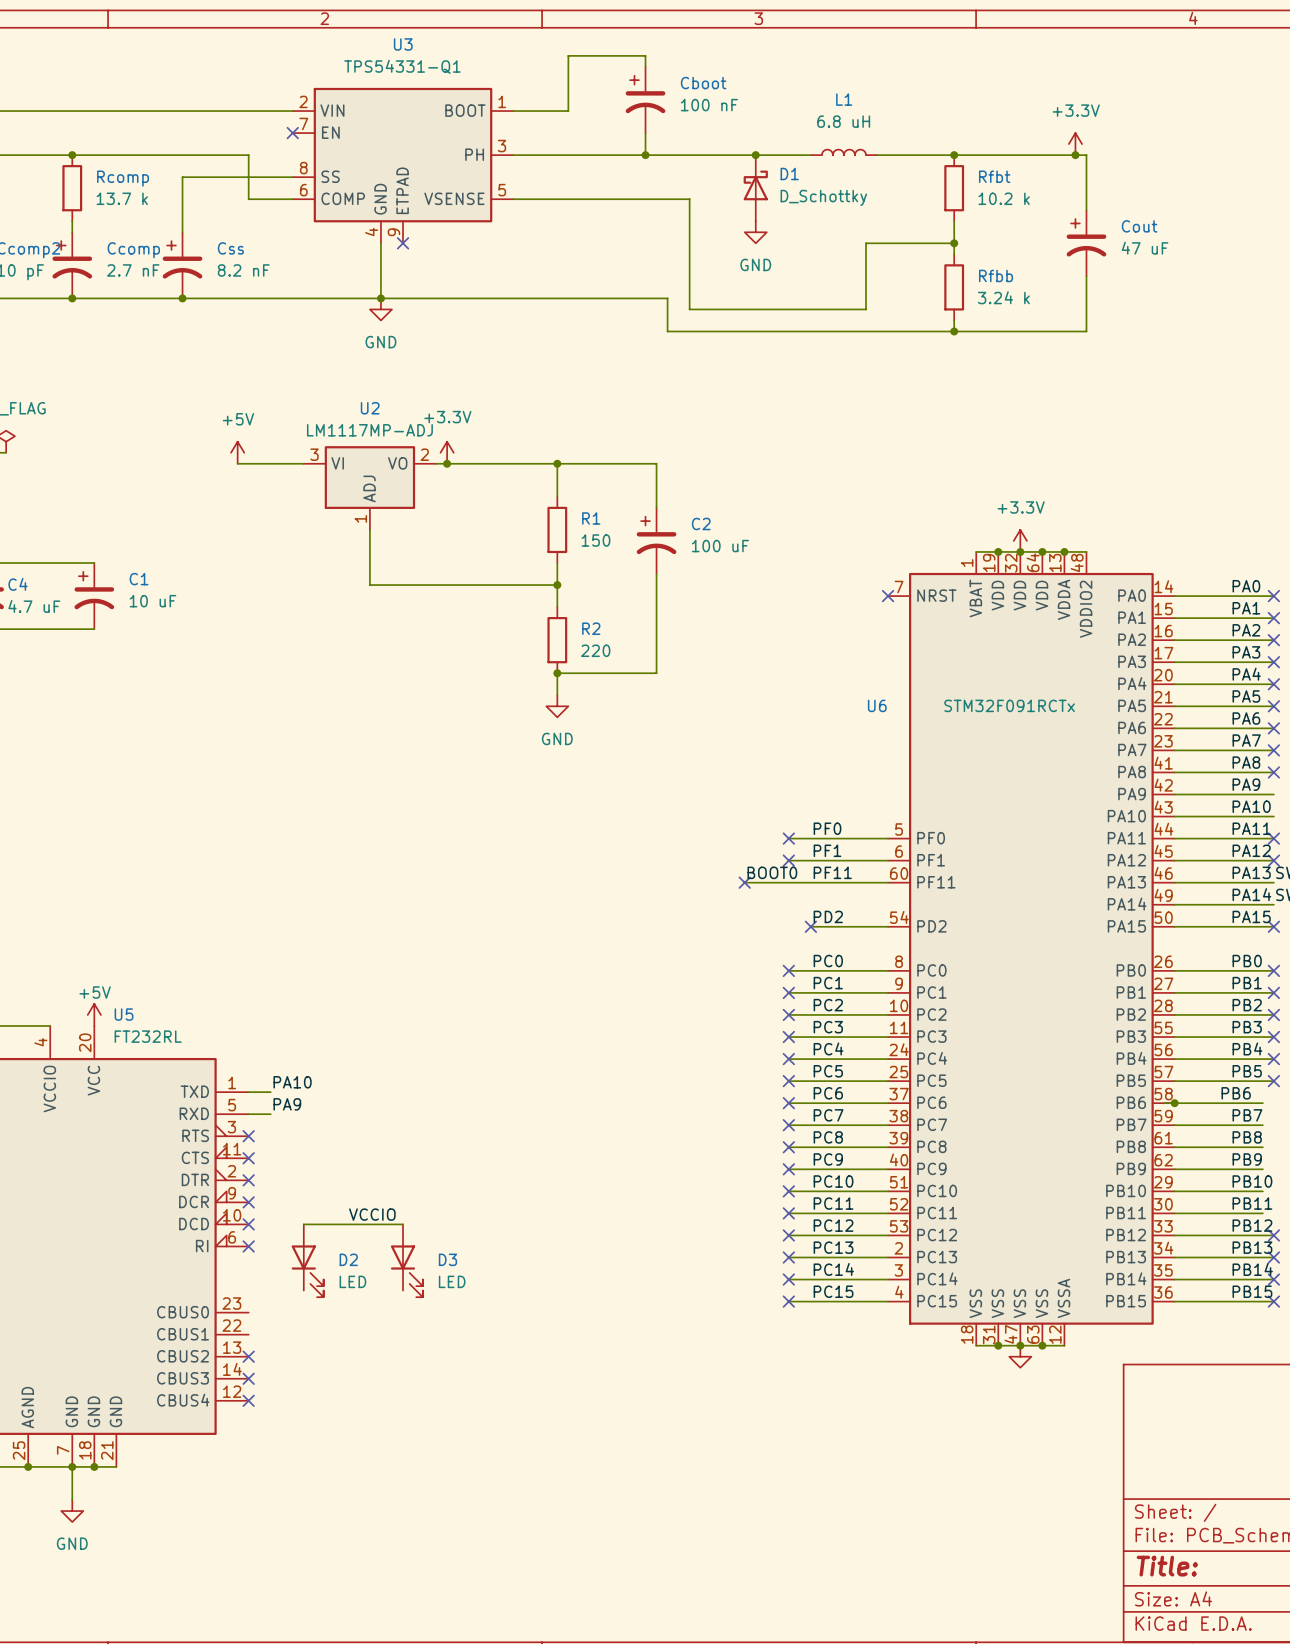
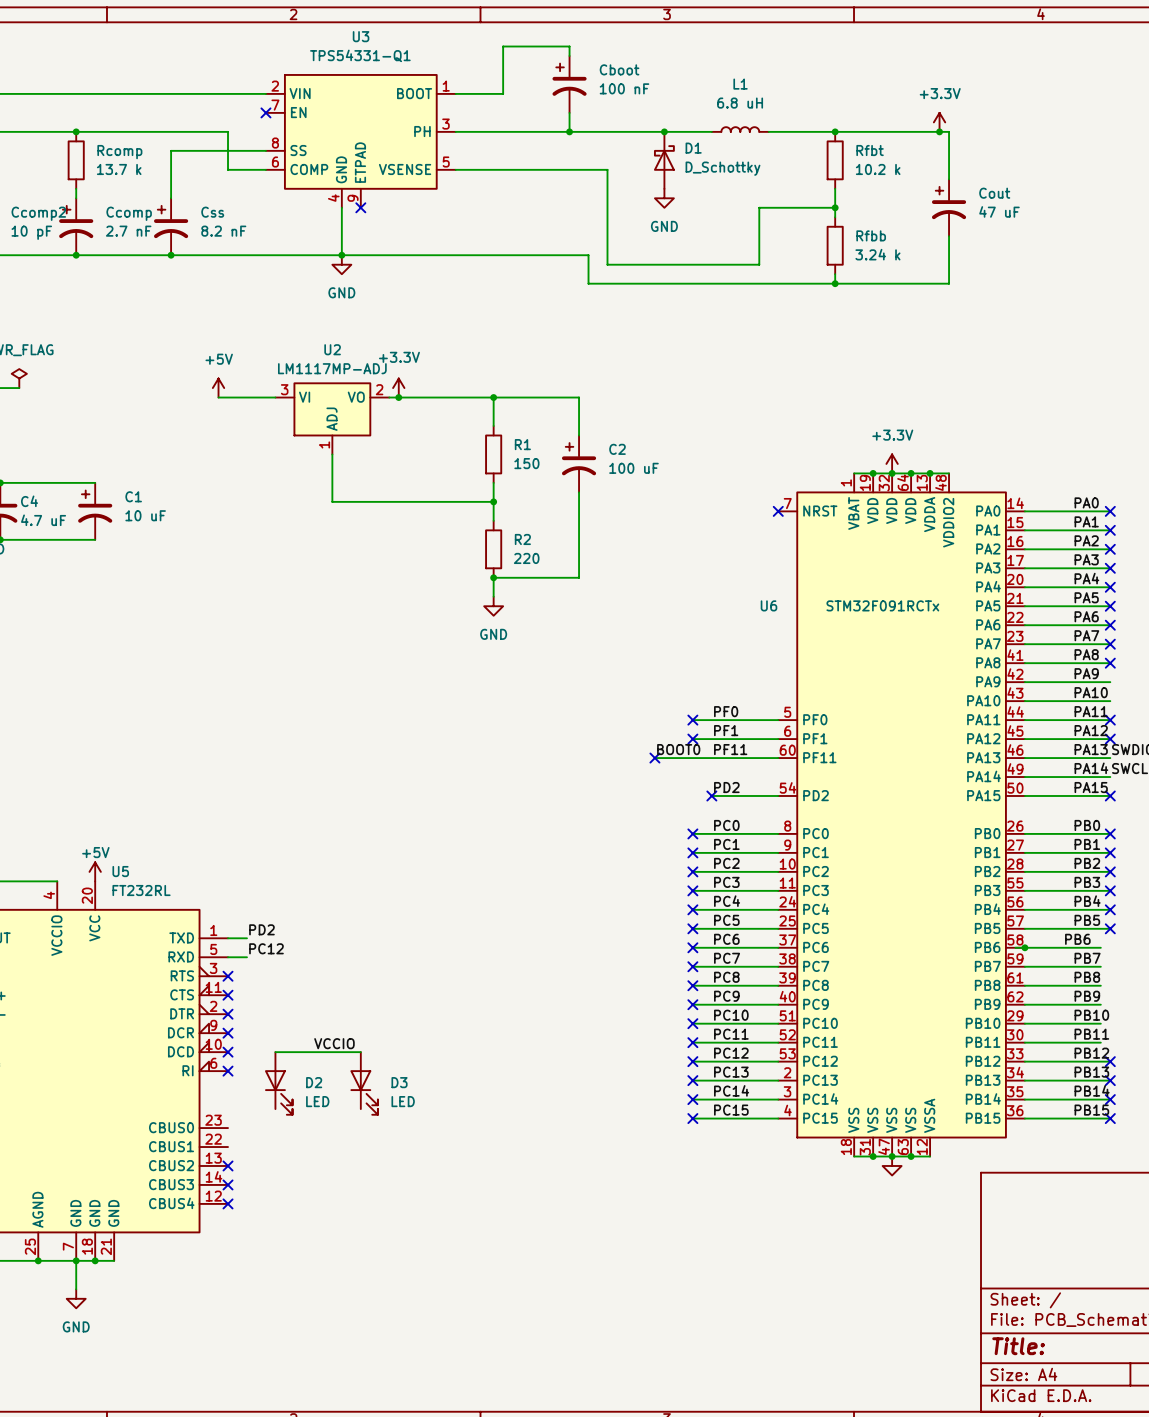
label: PA10 (292, 1082) -> PD2 (261, 929)
label: PA9 (287, 1104) -> PC12 (266, 948)

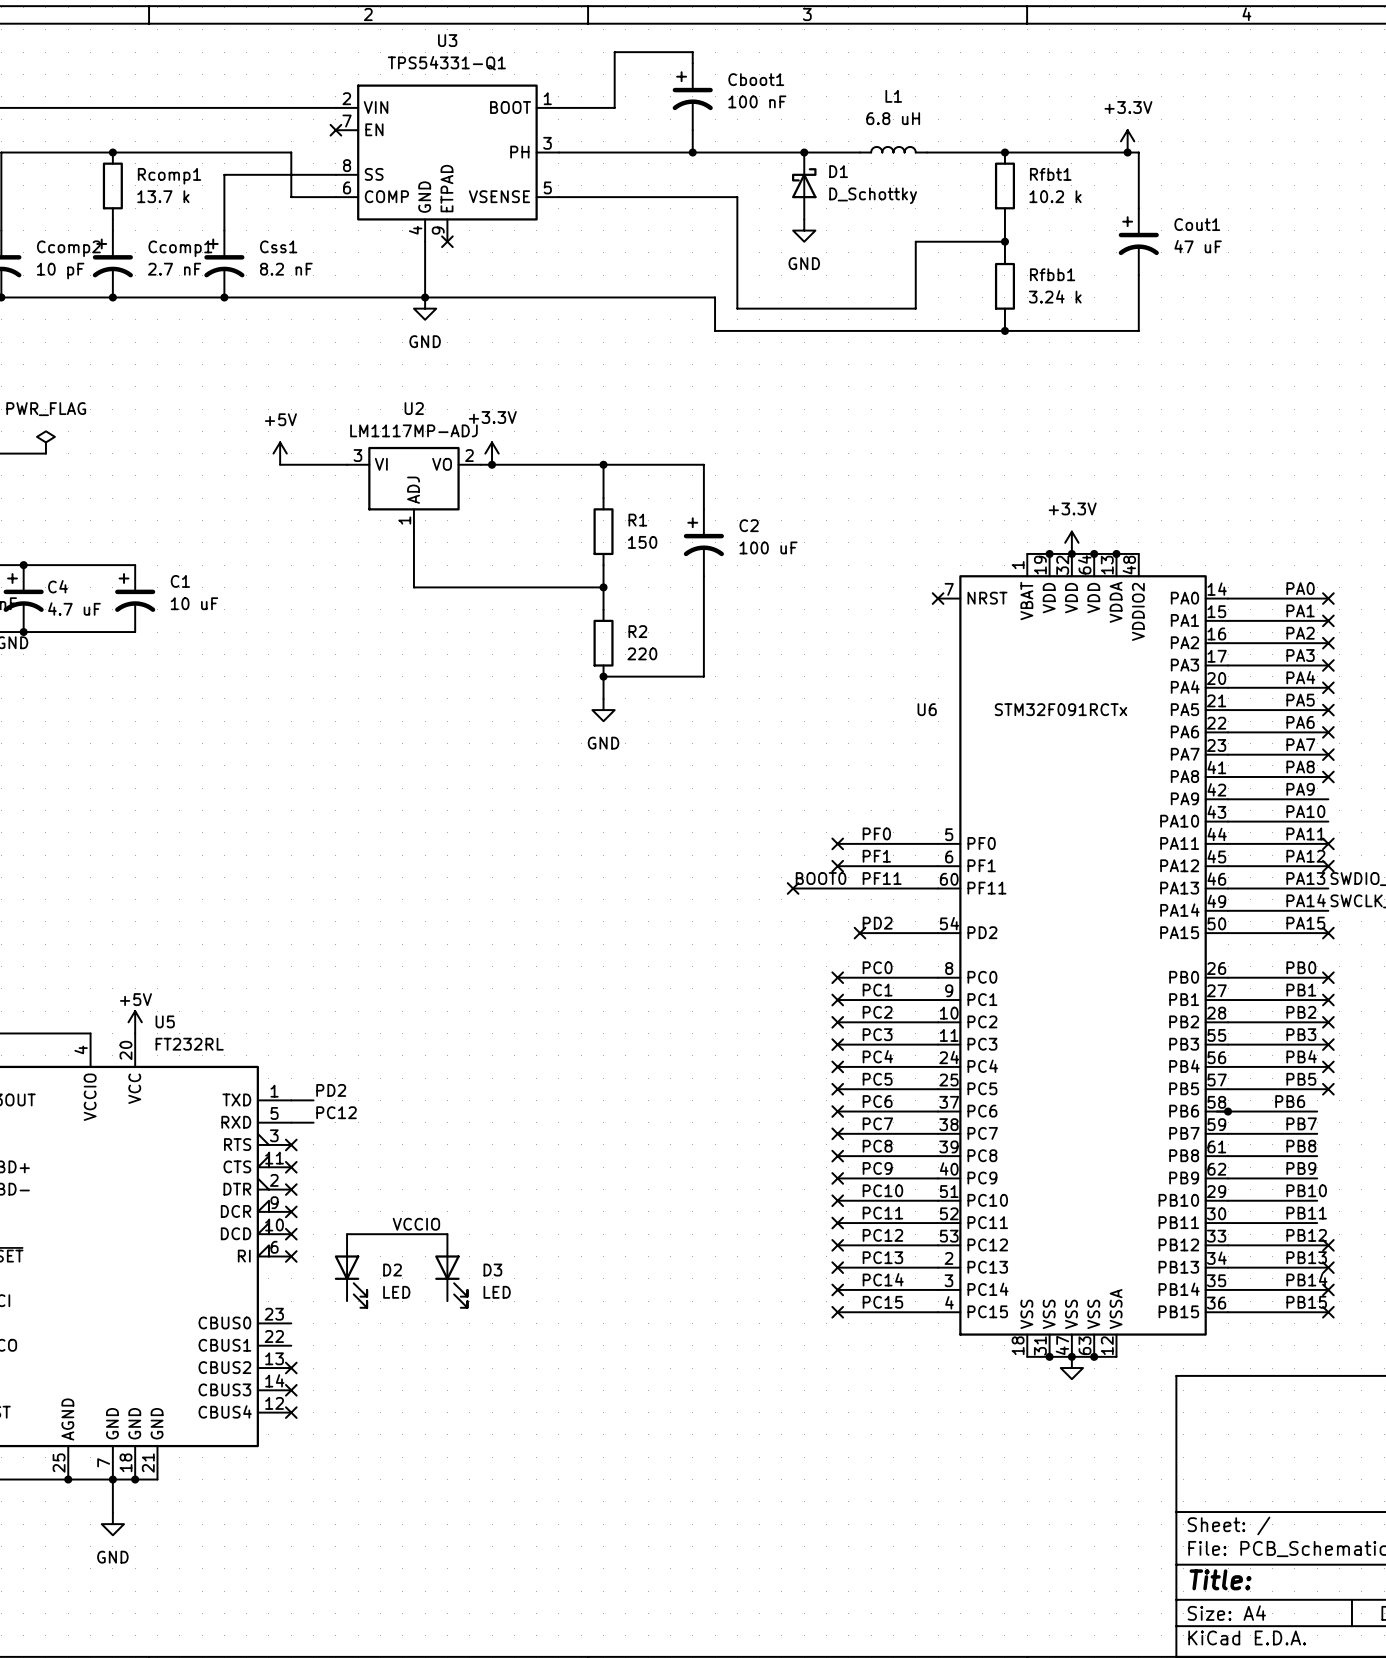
Cboot name: Cboot (619, 69) -> Cboot1 (756, 79)
Rfbt name: Rfbt (870, 150) -> Rfbt1 (1050, 174)
Rcomp name: Rcomp (119, 152) -> Rcomp1 (169, 176)
Cout name: Cout (994, 193) -> Cout1 (1197, 224)
Css name: Css (212, 212) -> Css1 (278, 246)
Ccomp name: Ccomp (129, 213) -> Ccomp1 (180, 248)
Rfbb name: Rfbb (871, 235) -> Rfbb1 (1052, 274)

